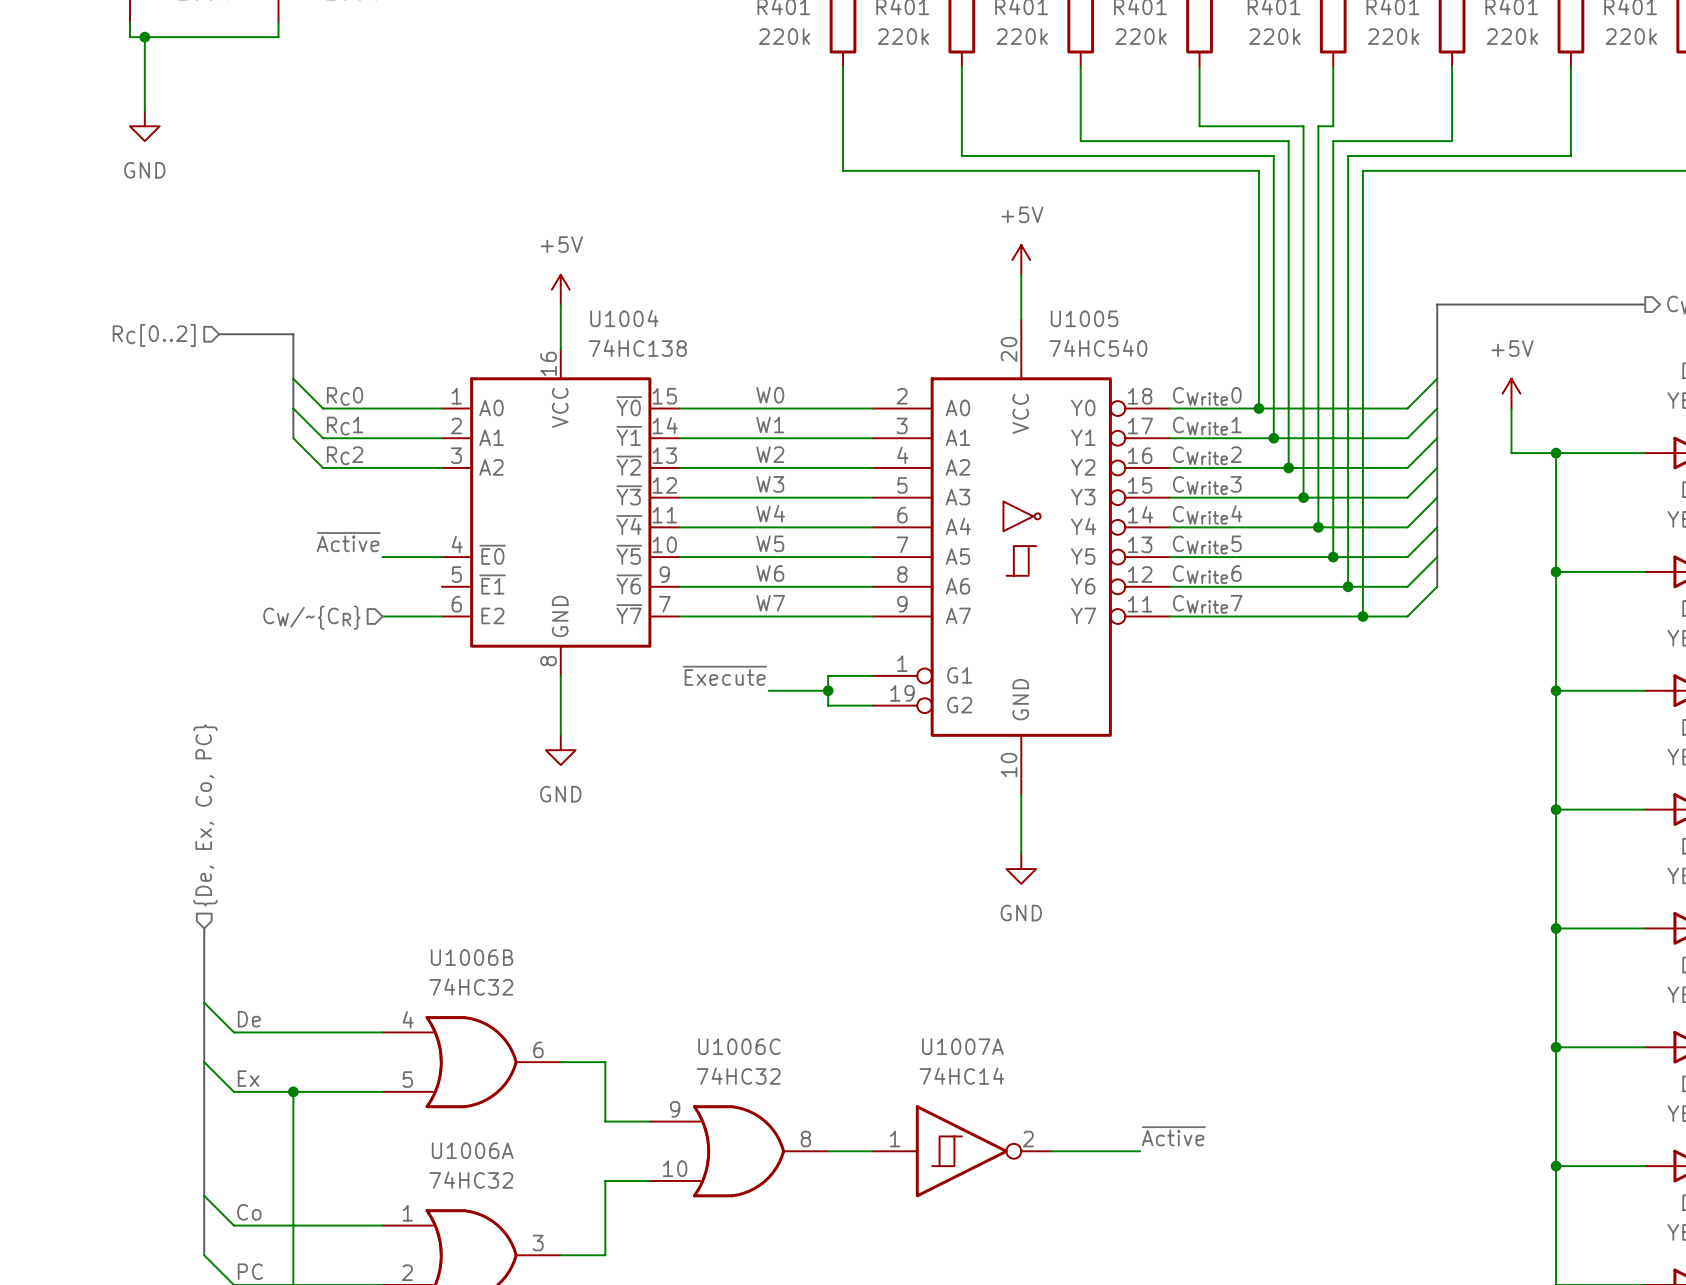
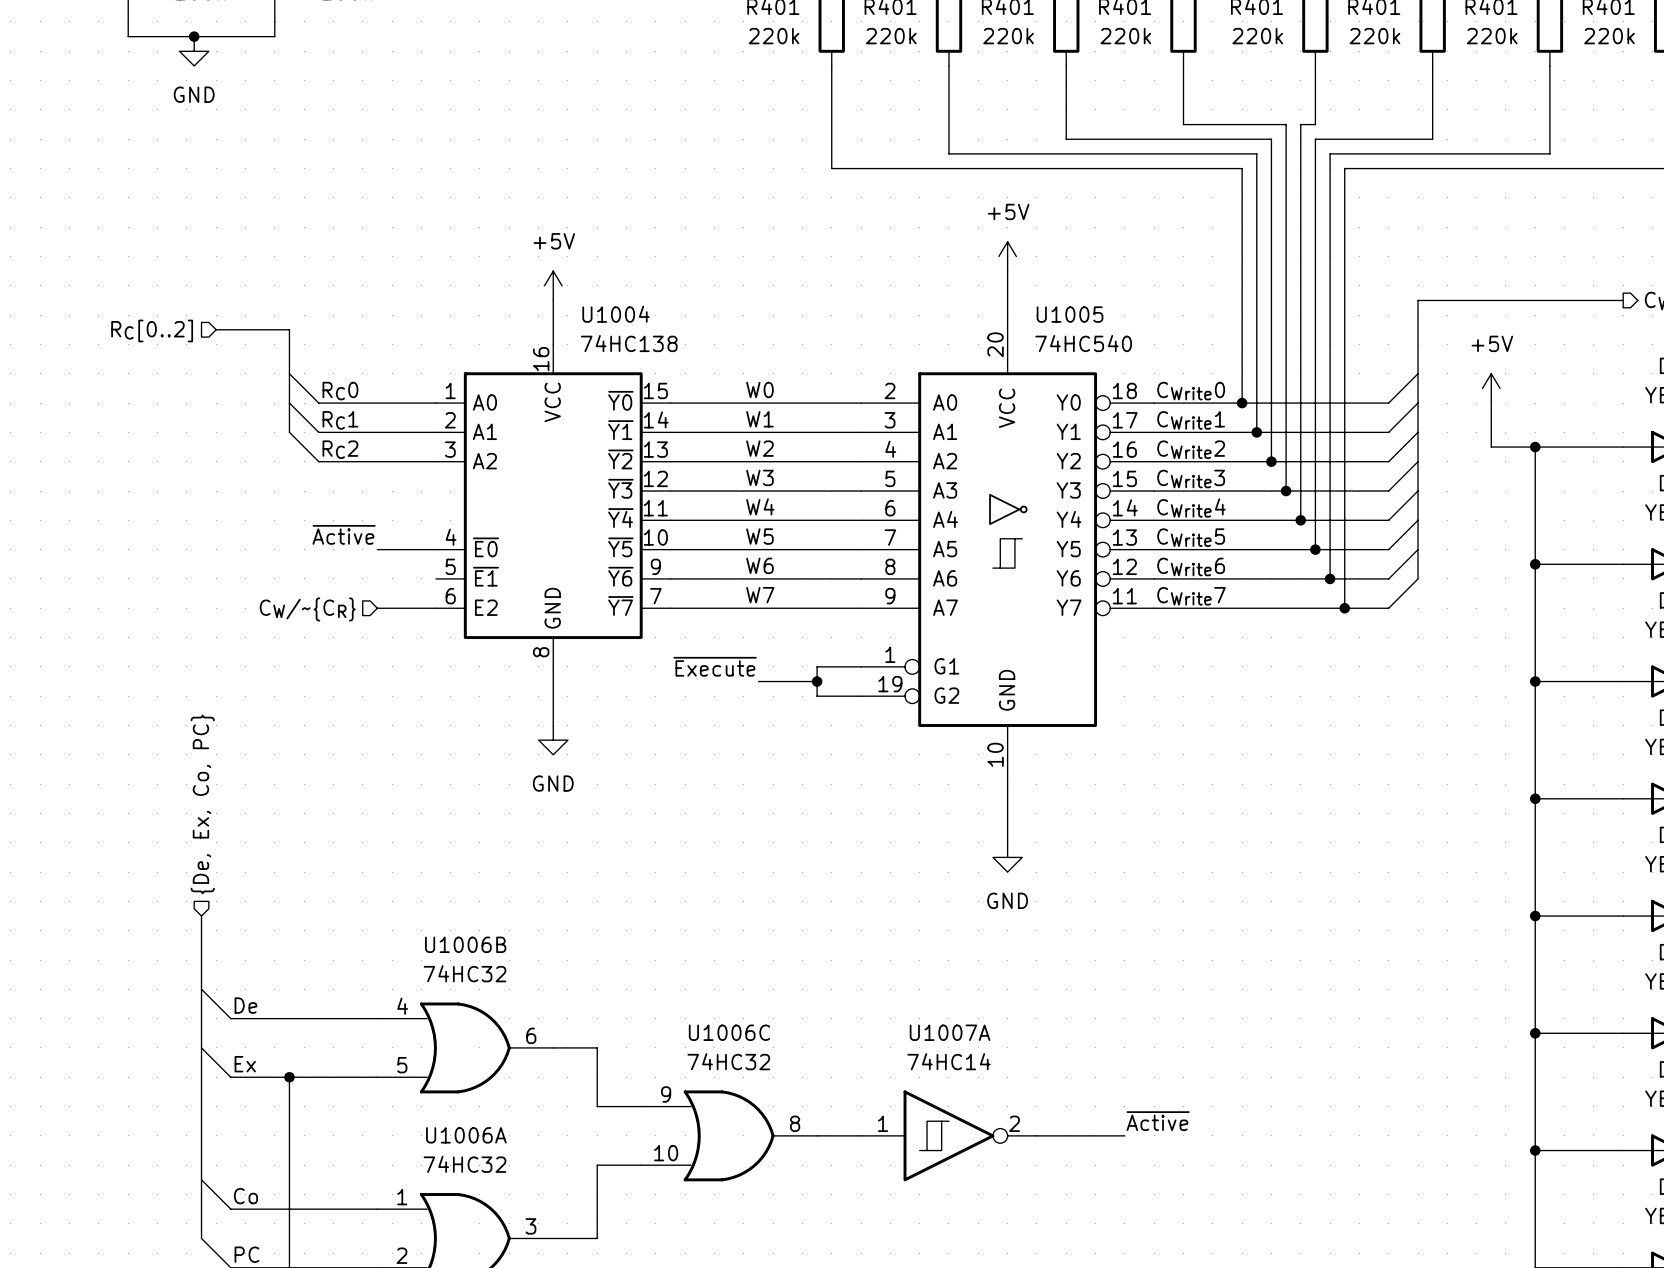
wire: (144, 37) (144, 111) -> none
junction position: (144, 37) -> (194, 36)
power symbol position: GND (144, 126) -> GND (194, 51)

